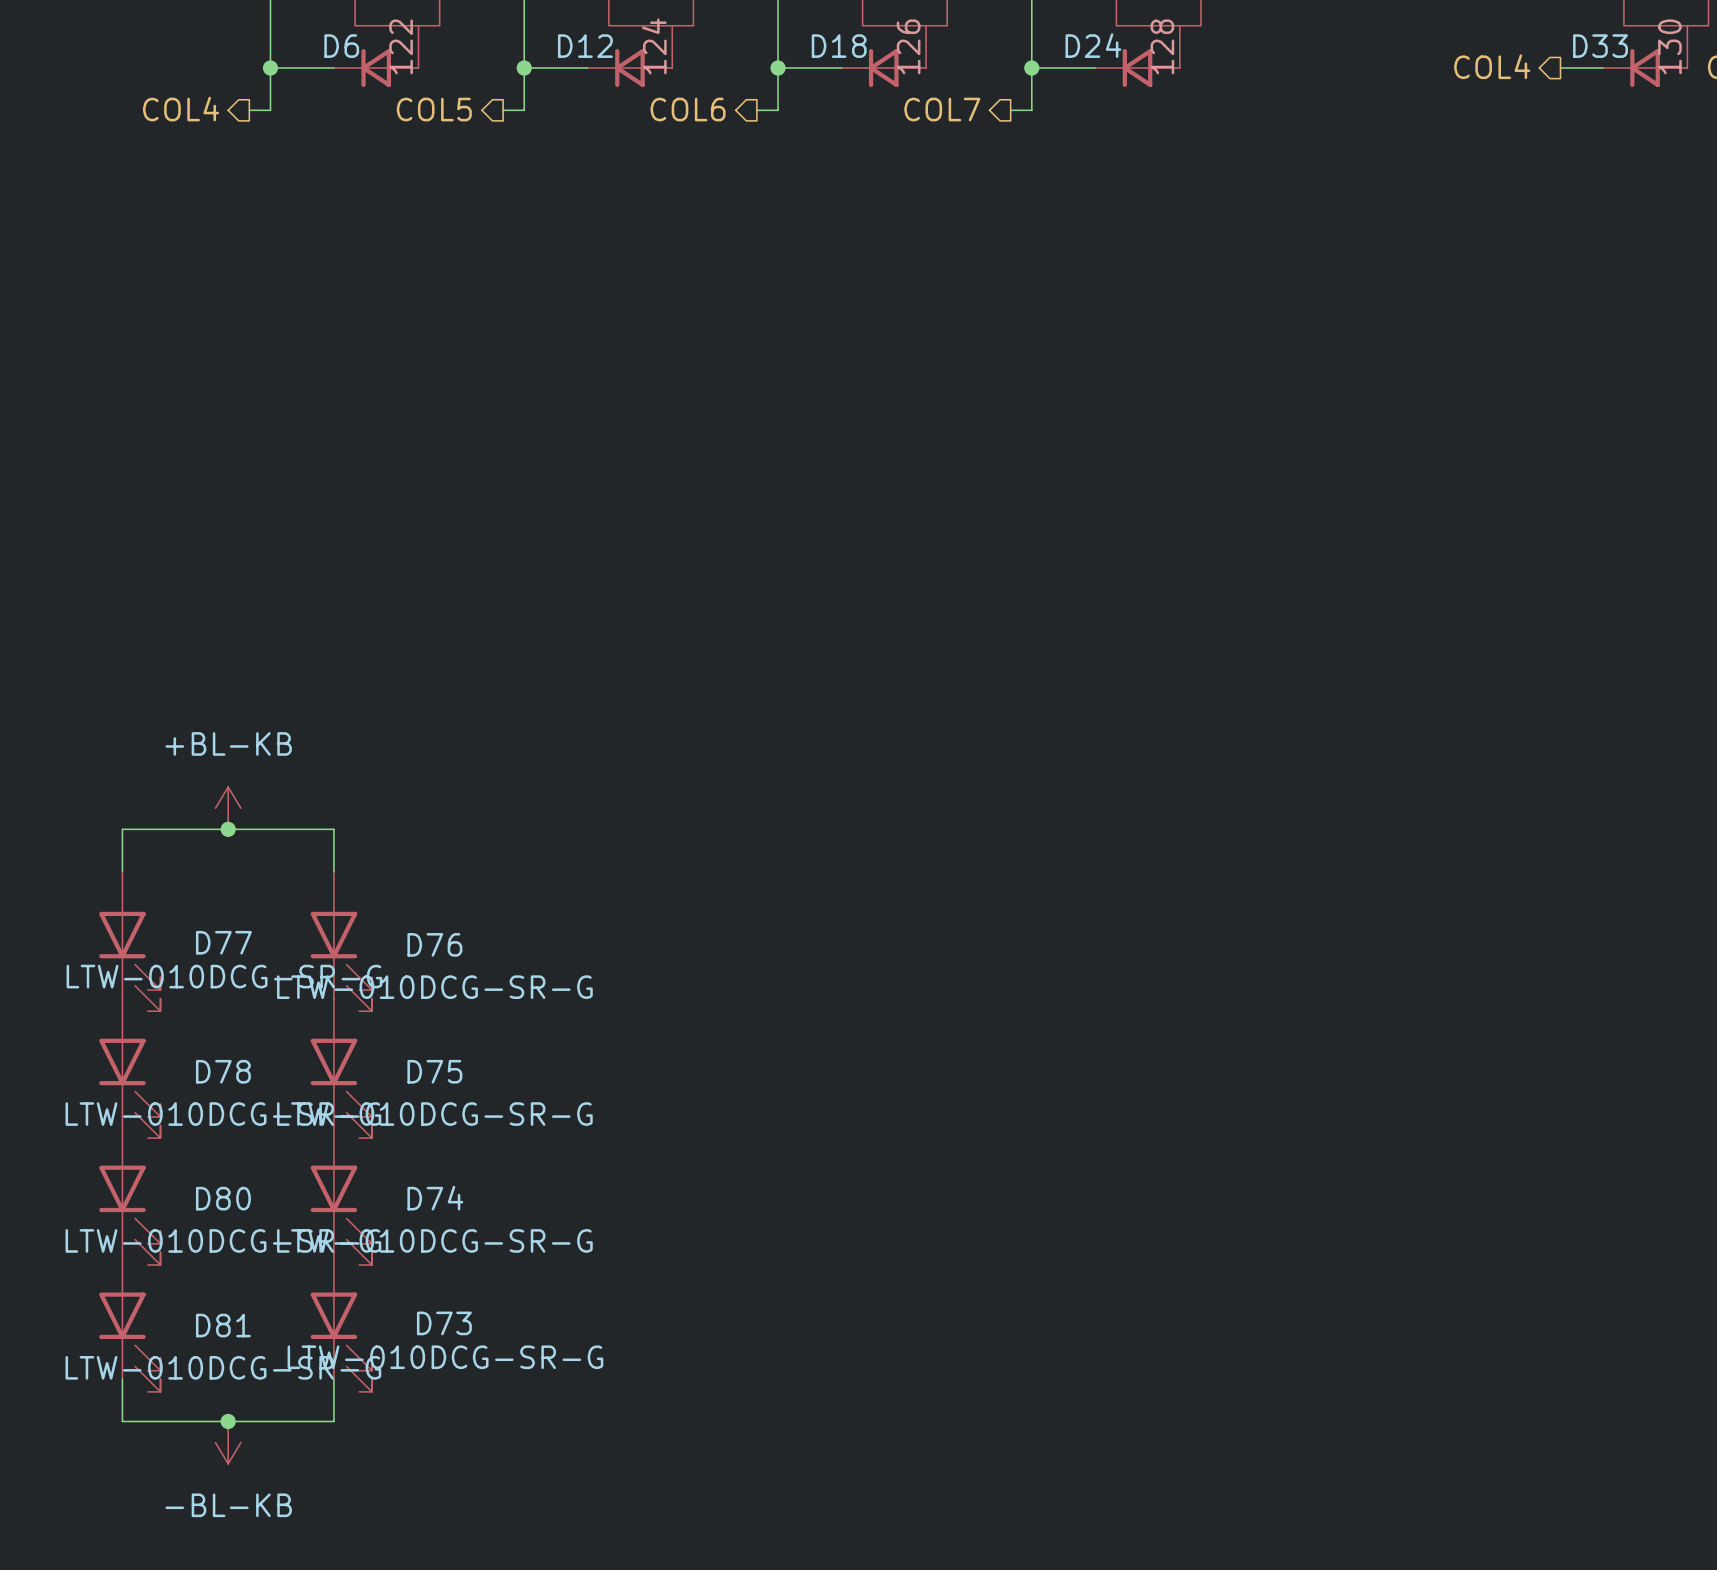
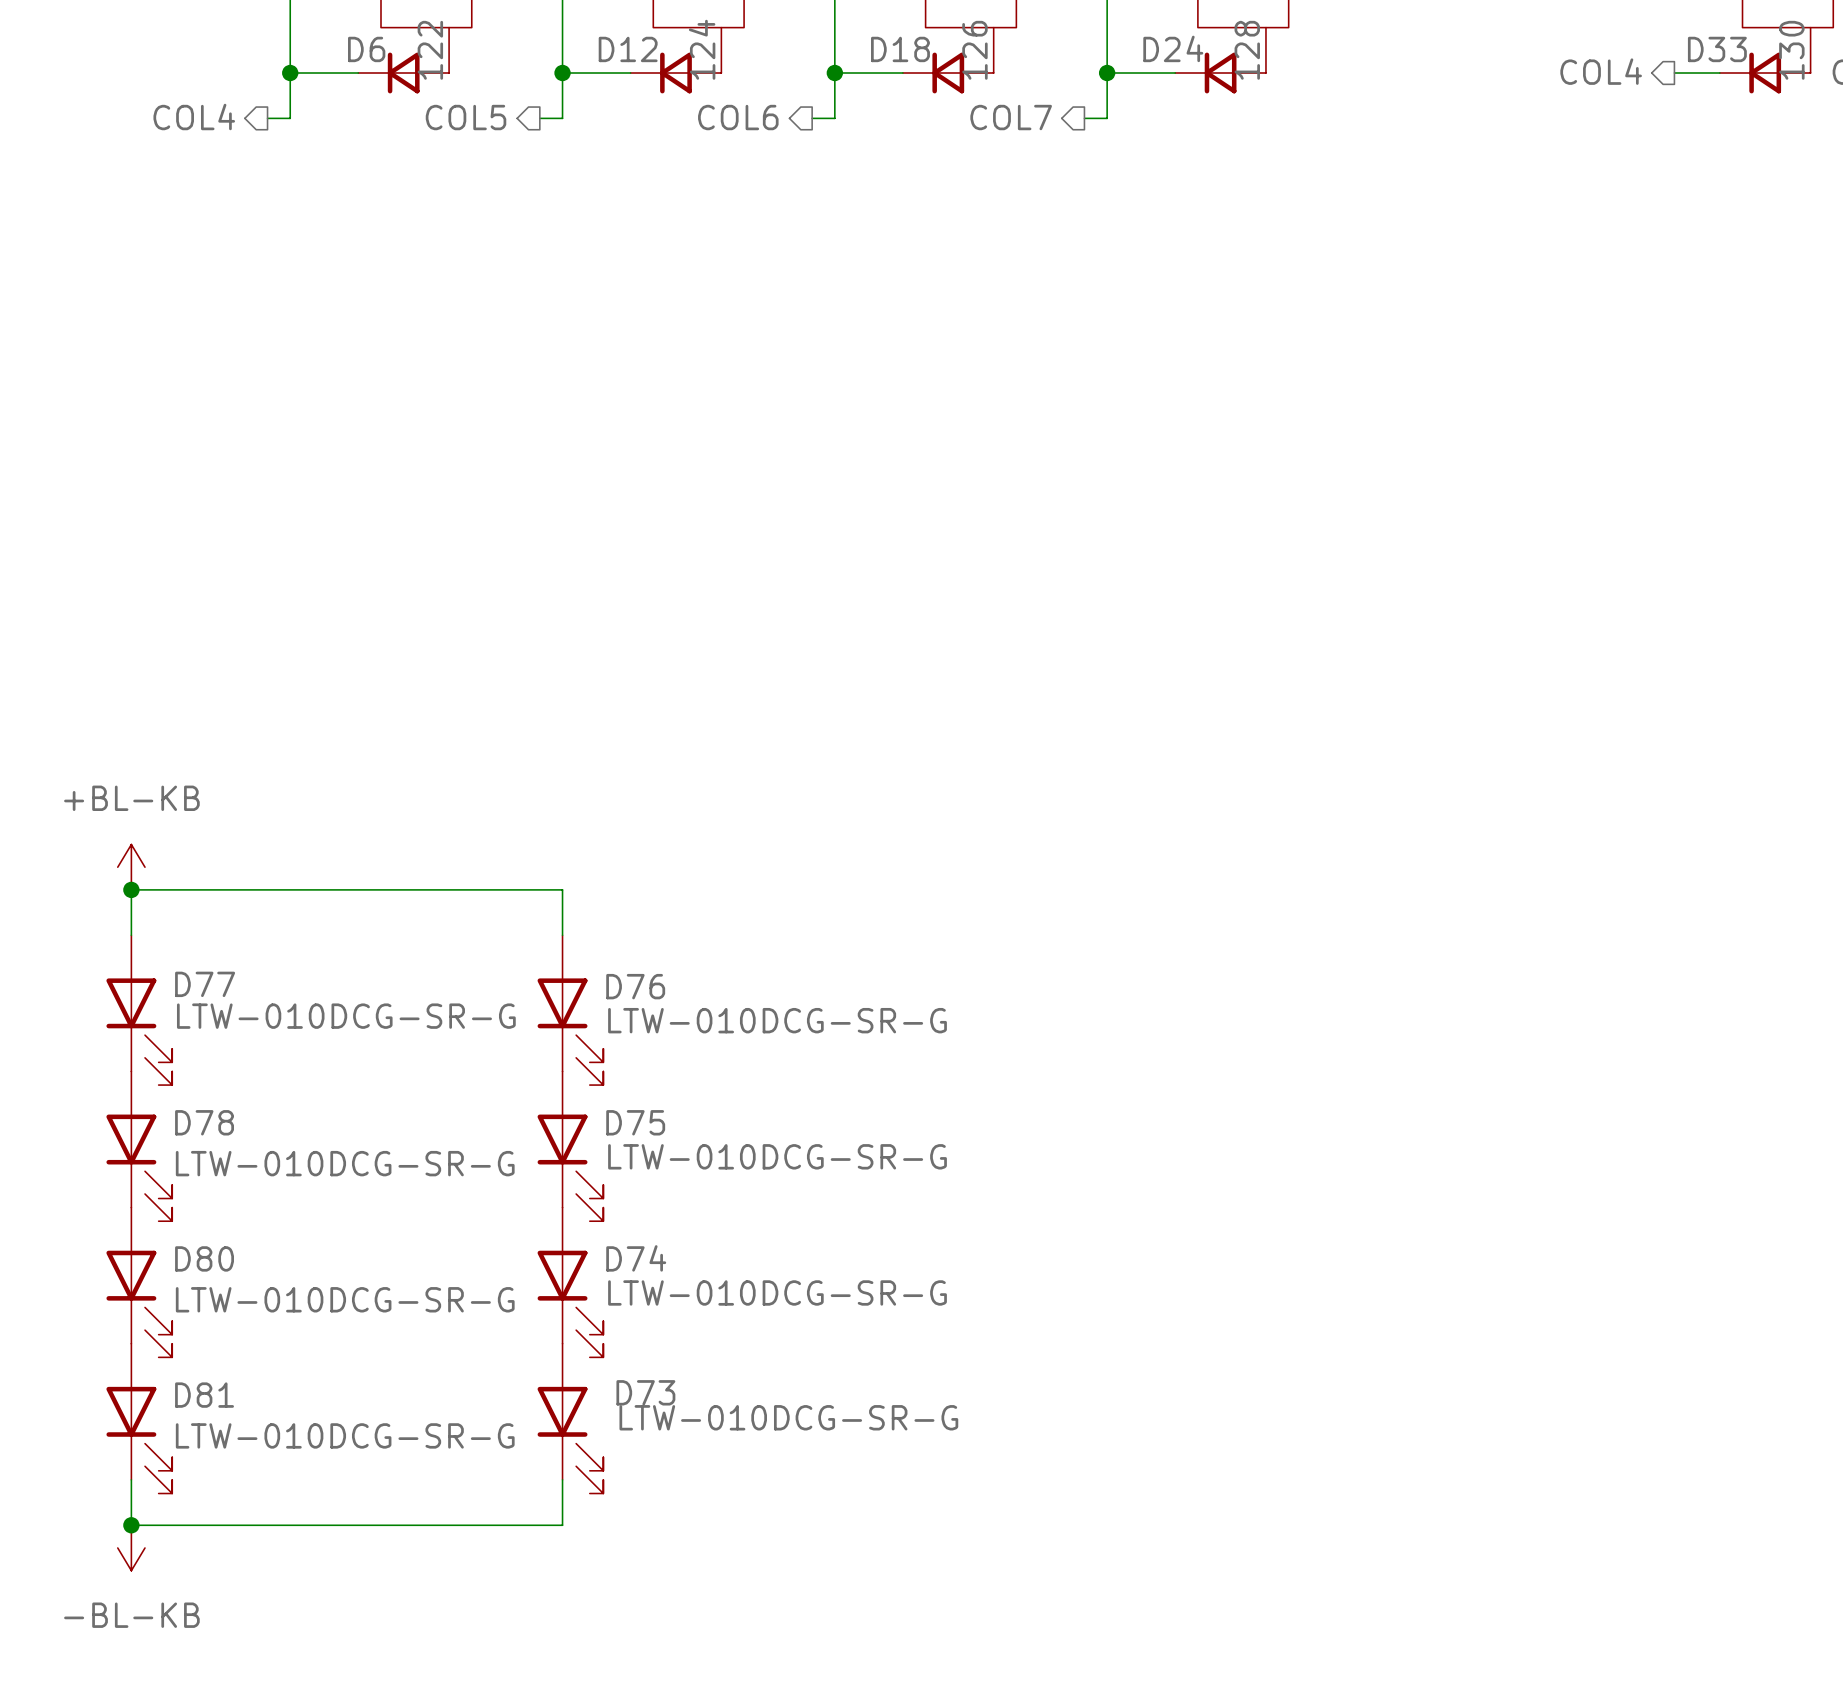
power symbol position: +BL-KB (228, 808) -> +BL-KB (131, 867)
junction: none -> (131, 889)
junction: (228, 829) -> none
wire: (333, 829) (333, 871) -> (358, 889) (562, 889) (562, 935)
D76 position: (341, 941) -> (570, 1010)
D77 name position: D77 (223, 942) -> D77 (205, 984)
D76 name position: D76 (434, 944) -> D76 (635, 986)
D77 value position: LTW-010DCG-SR-G (224, 976) -> LTW-010DCG-SR-G (346, 1016)
D76 value position: LTW-010DCG-SR-G (434, 987) -> LTW-010DCG-SR-G (777, 1020)
D75 position: (341, 1068) -> (570, 1146)
D78 name position: D78 (223, 1071) -> D78 (204, 1122)
D75 name position: D75 (434, 1071) -> D75 (635, 1122)
D78 value position: LTW-010DCG-SR-G (223, 1114) -> LTW-010DCG-SR-G (345, 1163)
D75 value position: LTW-010DCG-SR-G (434, 1114) -> LTW-010DCG-SR-G (777, 1156)
D74 position: (341, 1195) -> (570, 1282)
D80 name position: D80 (223, 1198) -> D80 (204, 1258)
D74 name position: D74 (435, 1198) -> D74 (636, 1258)
D80 value position: LTW-010DCG-SR-G (223, 1240) -> LTW-010DCG-SR-G (345, 1299)
D74 value position: LTW-010DCG-SR-G (434, 1240) -> LTW-010DCG-SR-G (777, 1292)
D73 position: (341, 1322) -> (570, 1418)
D73 name position: D73 (444, 1323) -> D73 (645, 1392)
D81 name position: D81 (223, 1325) -> D81 (204, 1395)
D73 value position: LTW-010DCG-SR-G (445, 1357) -> LTW-010DCG-SR-G (788, 1417)
D81 value position: LTW-010DCG-SR-G (223, 1367) -> LTW-010DCG-SR-G (345, 1435)
wire: (333, 1379) (333, 1421) -> (562, 1479) (562, 1525) (358, 1525)
junction: none -> (131, 1525)
junction: (228, 1421) -> none
power symbol position: -BL-KB (228, 1442) -> -BL-KB (131, 1547)

